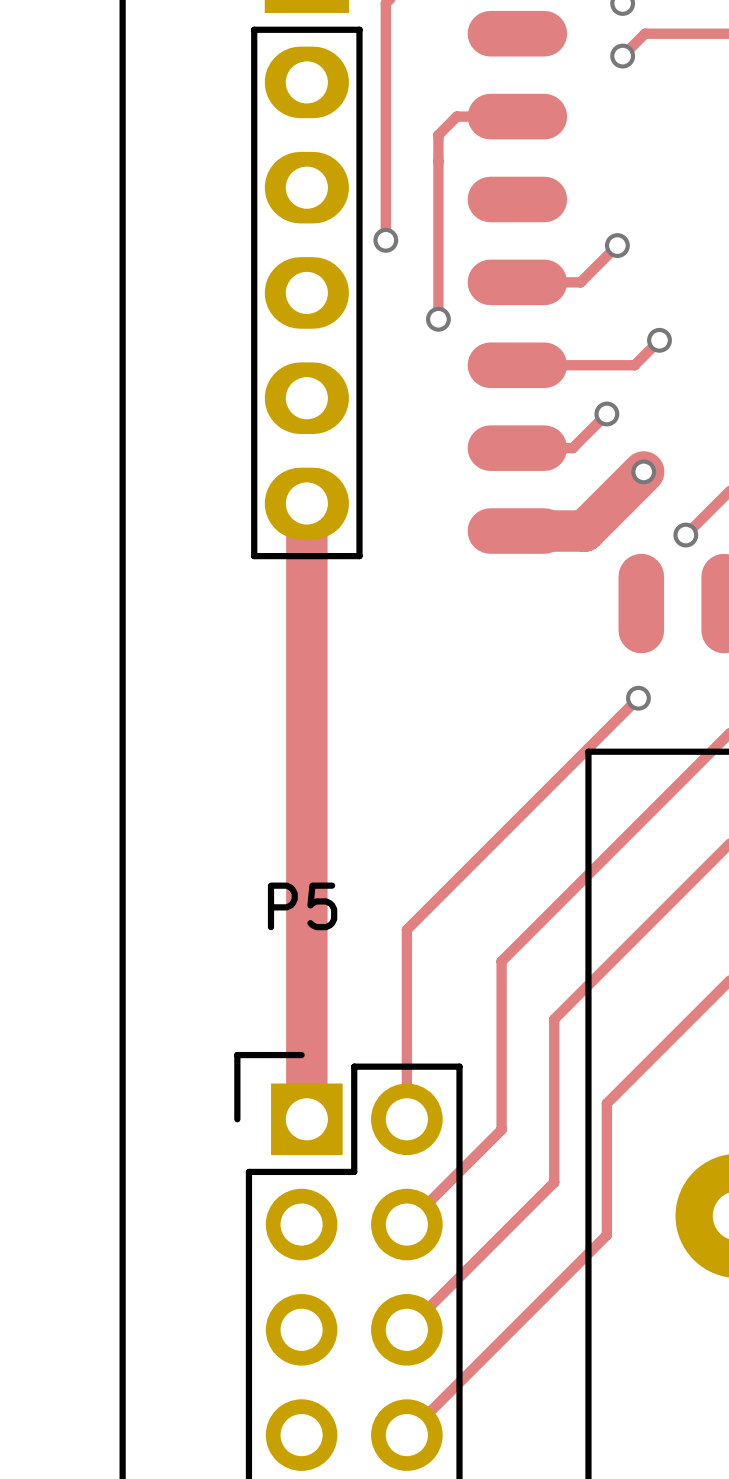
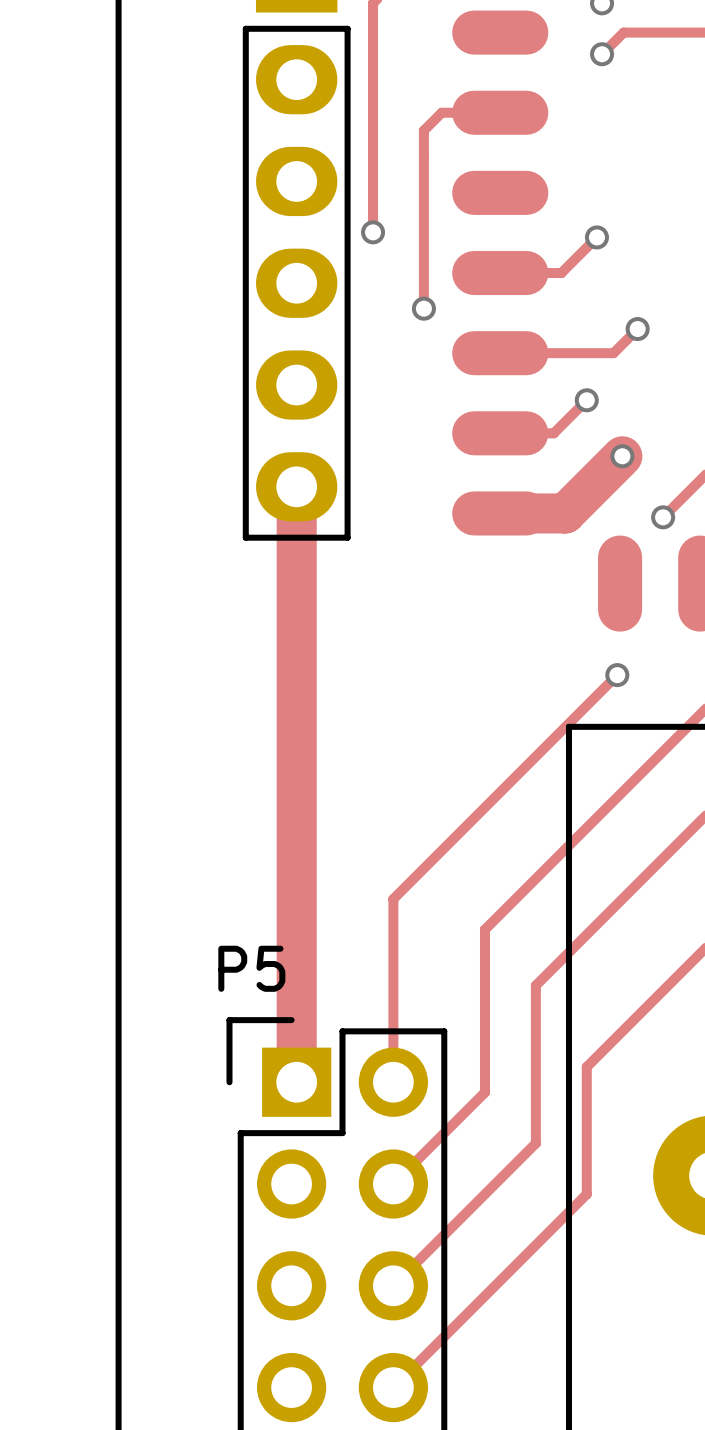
P5 name position: P5 (302, 906) -> P5 (251, 968)

